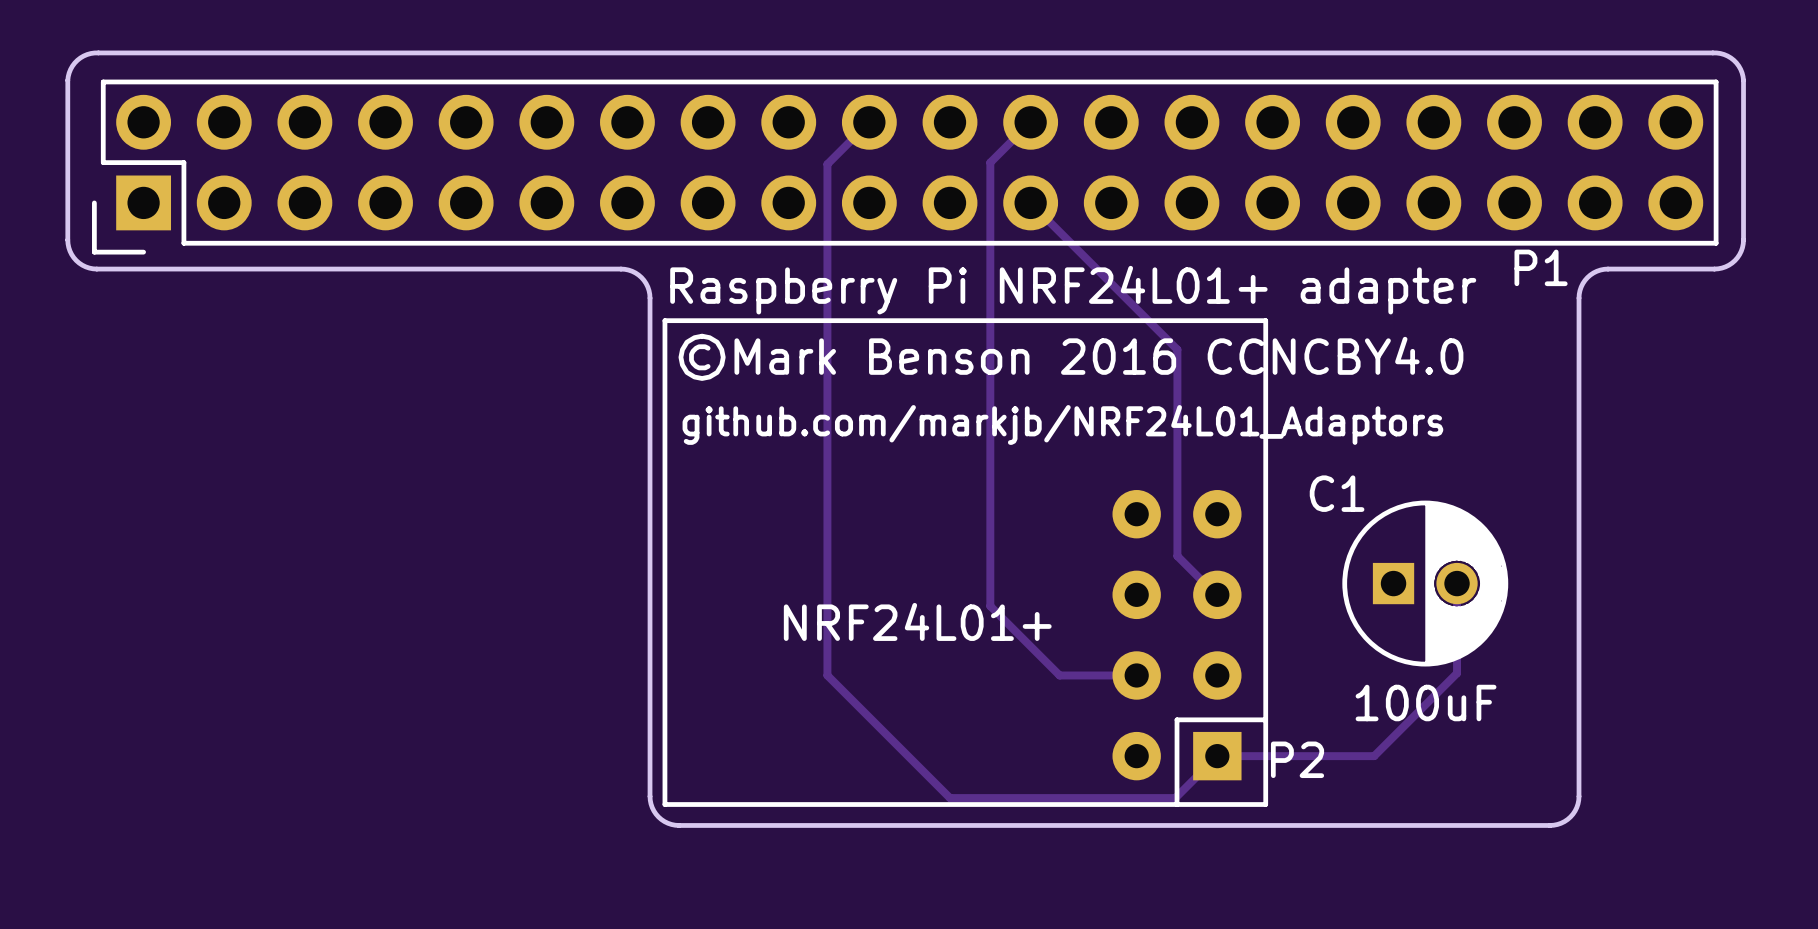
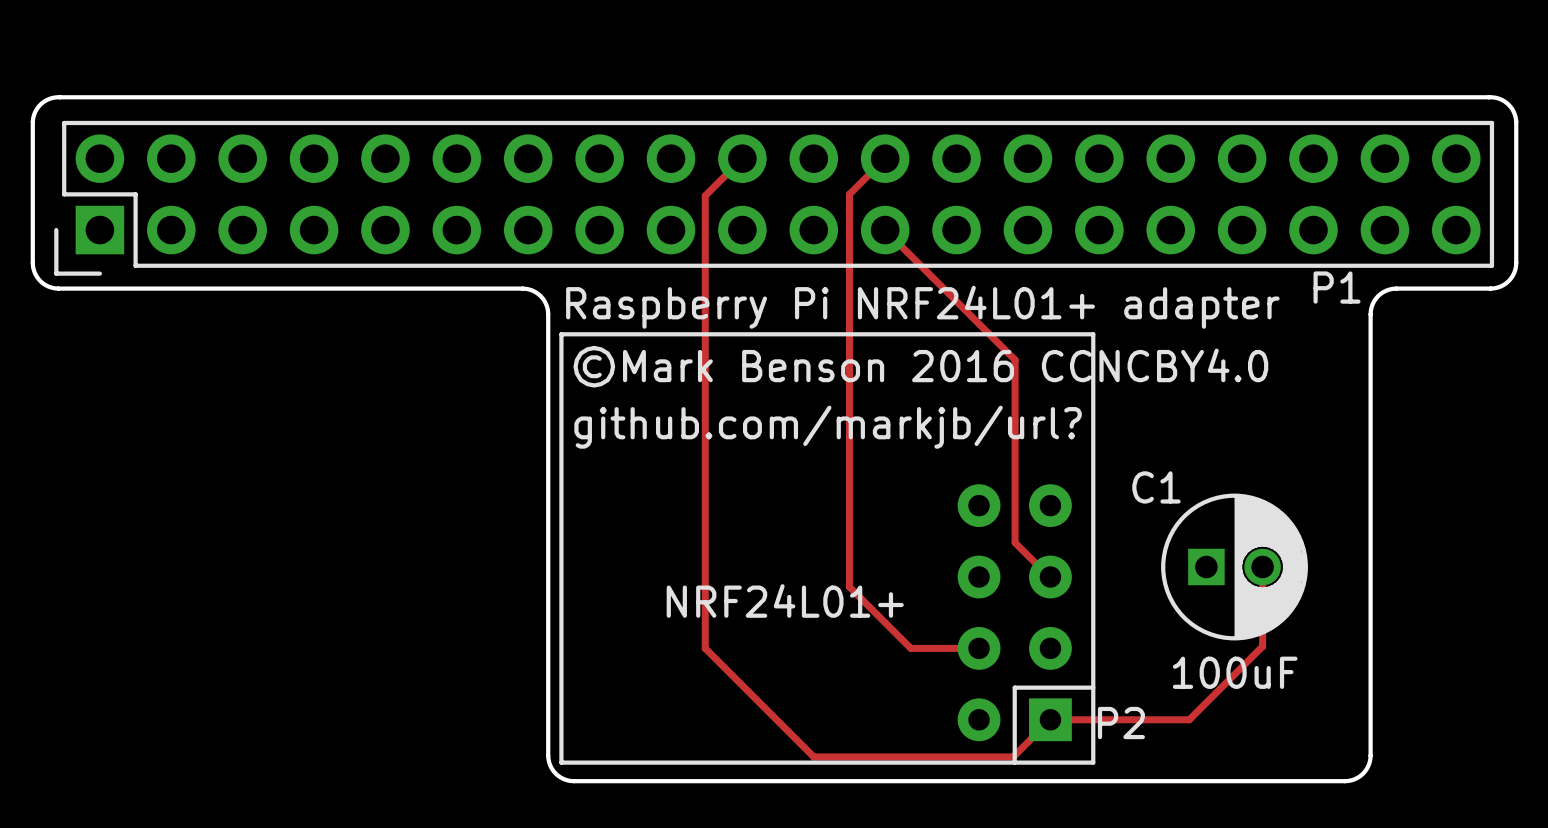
text: github.com/markjb/NRF24L01_Adaptors (1062, 424) -> github.com/markjb/url? (828, 427)

